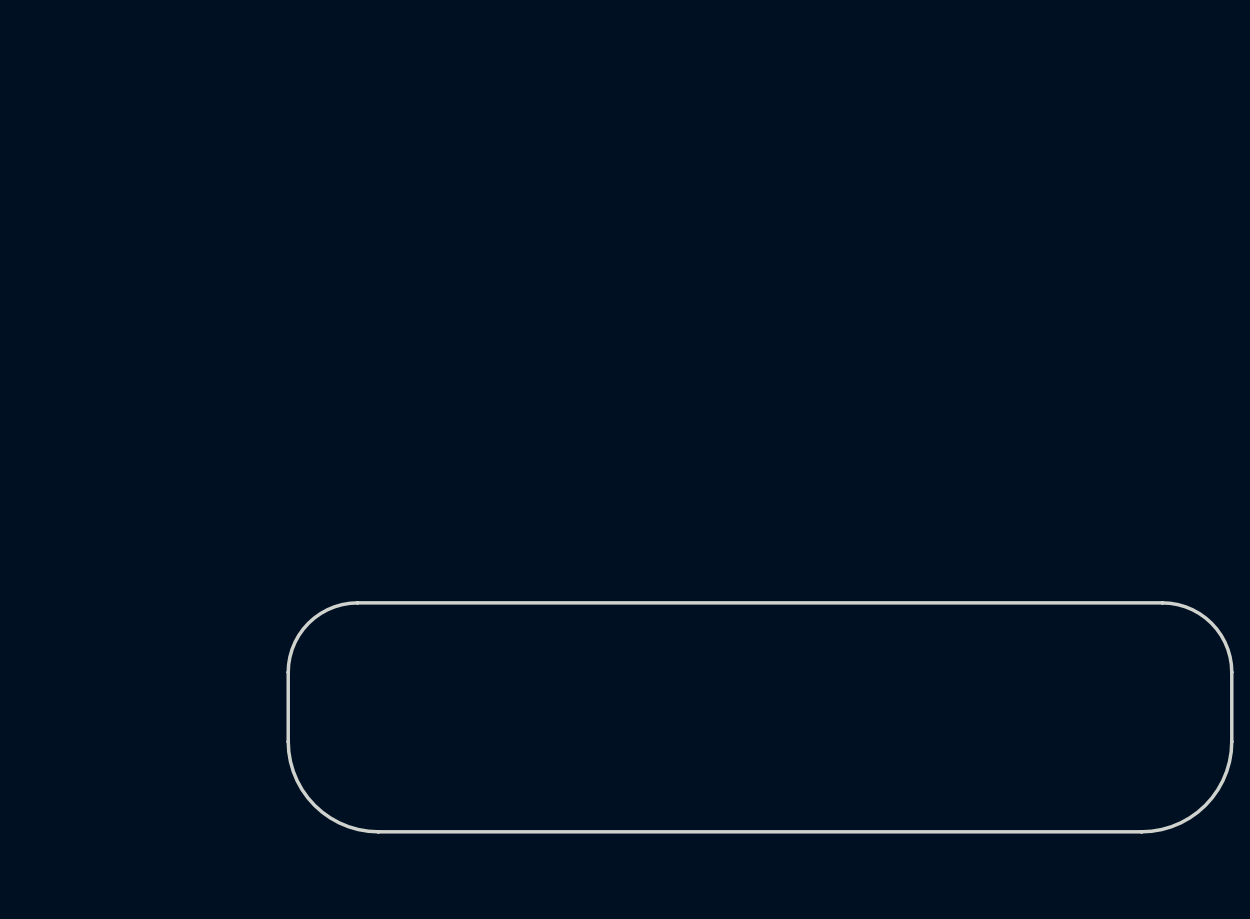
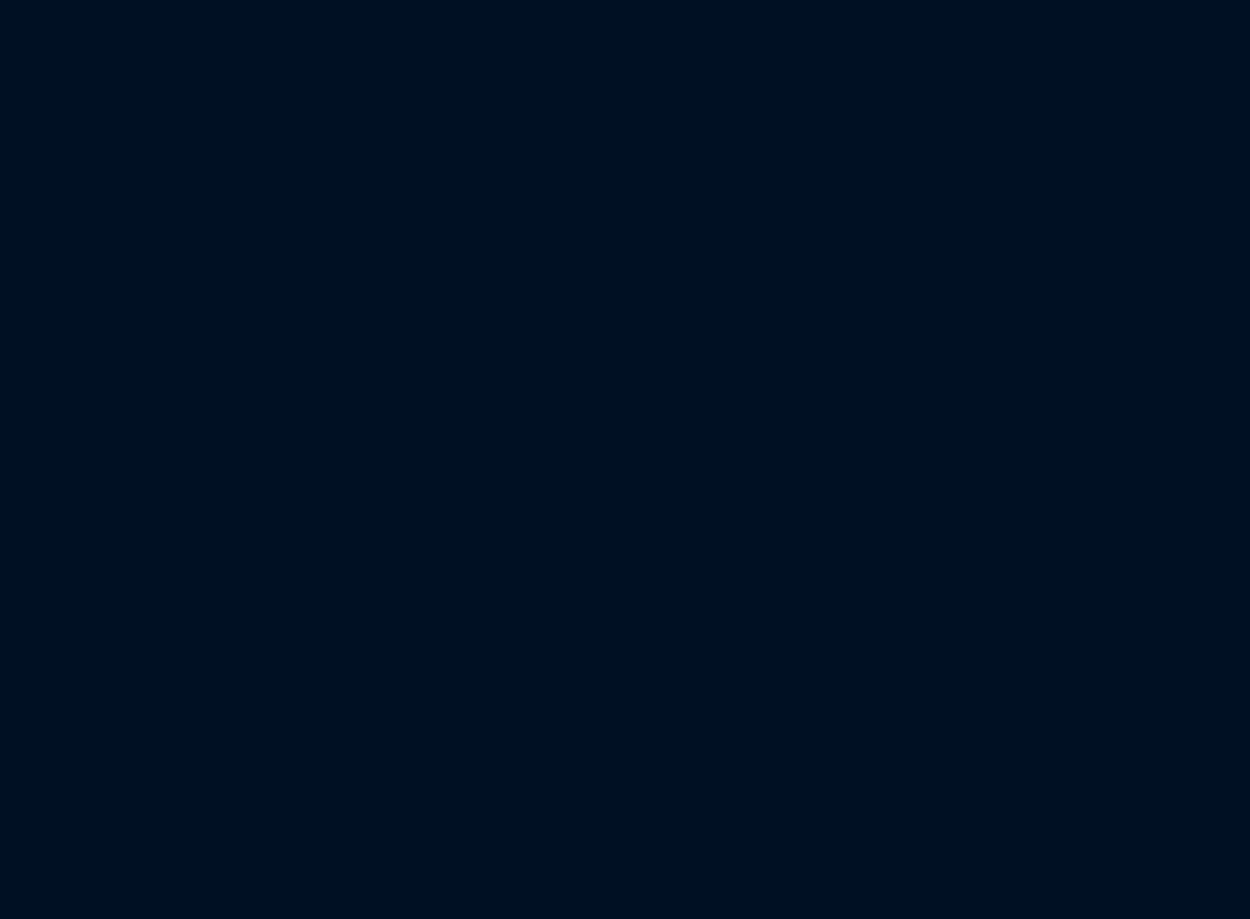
board edge: (1162, 602) (357, 602) (342, 604) (327, 609) (308, 623) (298, 635) (292, 649) (288, 672) (288, 741) (290, 761) (302, 789) (322, 812) (339, 822) (368, 831) (1141, 831) (1161, 829) (1189, 817) (1212, 797) (1226, 771) (1231, 741) (1231, 664) (1224, 642) (1216, 628) (1199, 613) (1177, 604) (1162, 602) -> none

